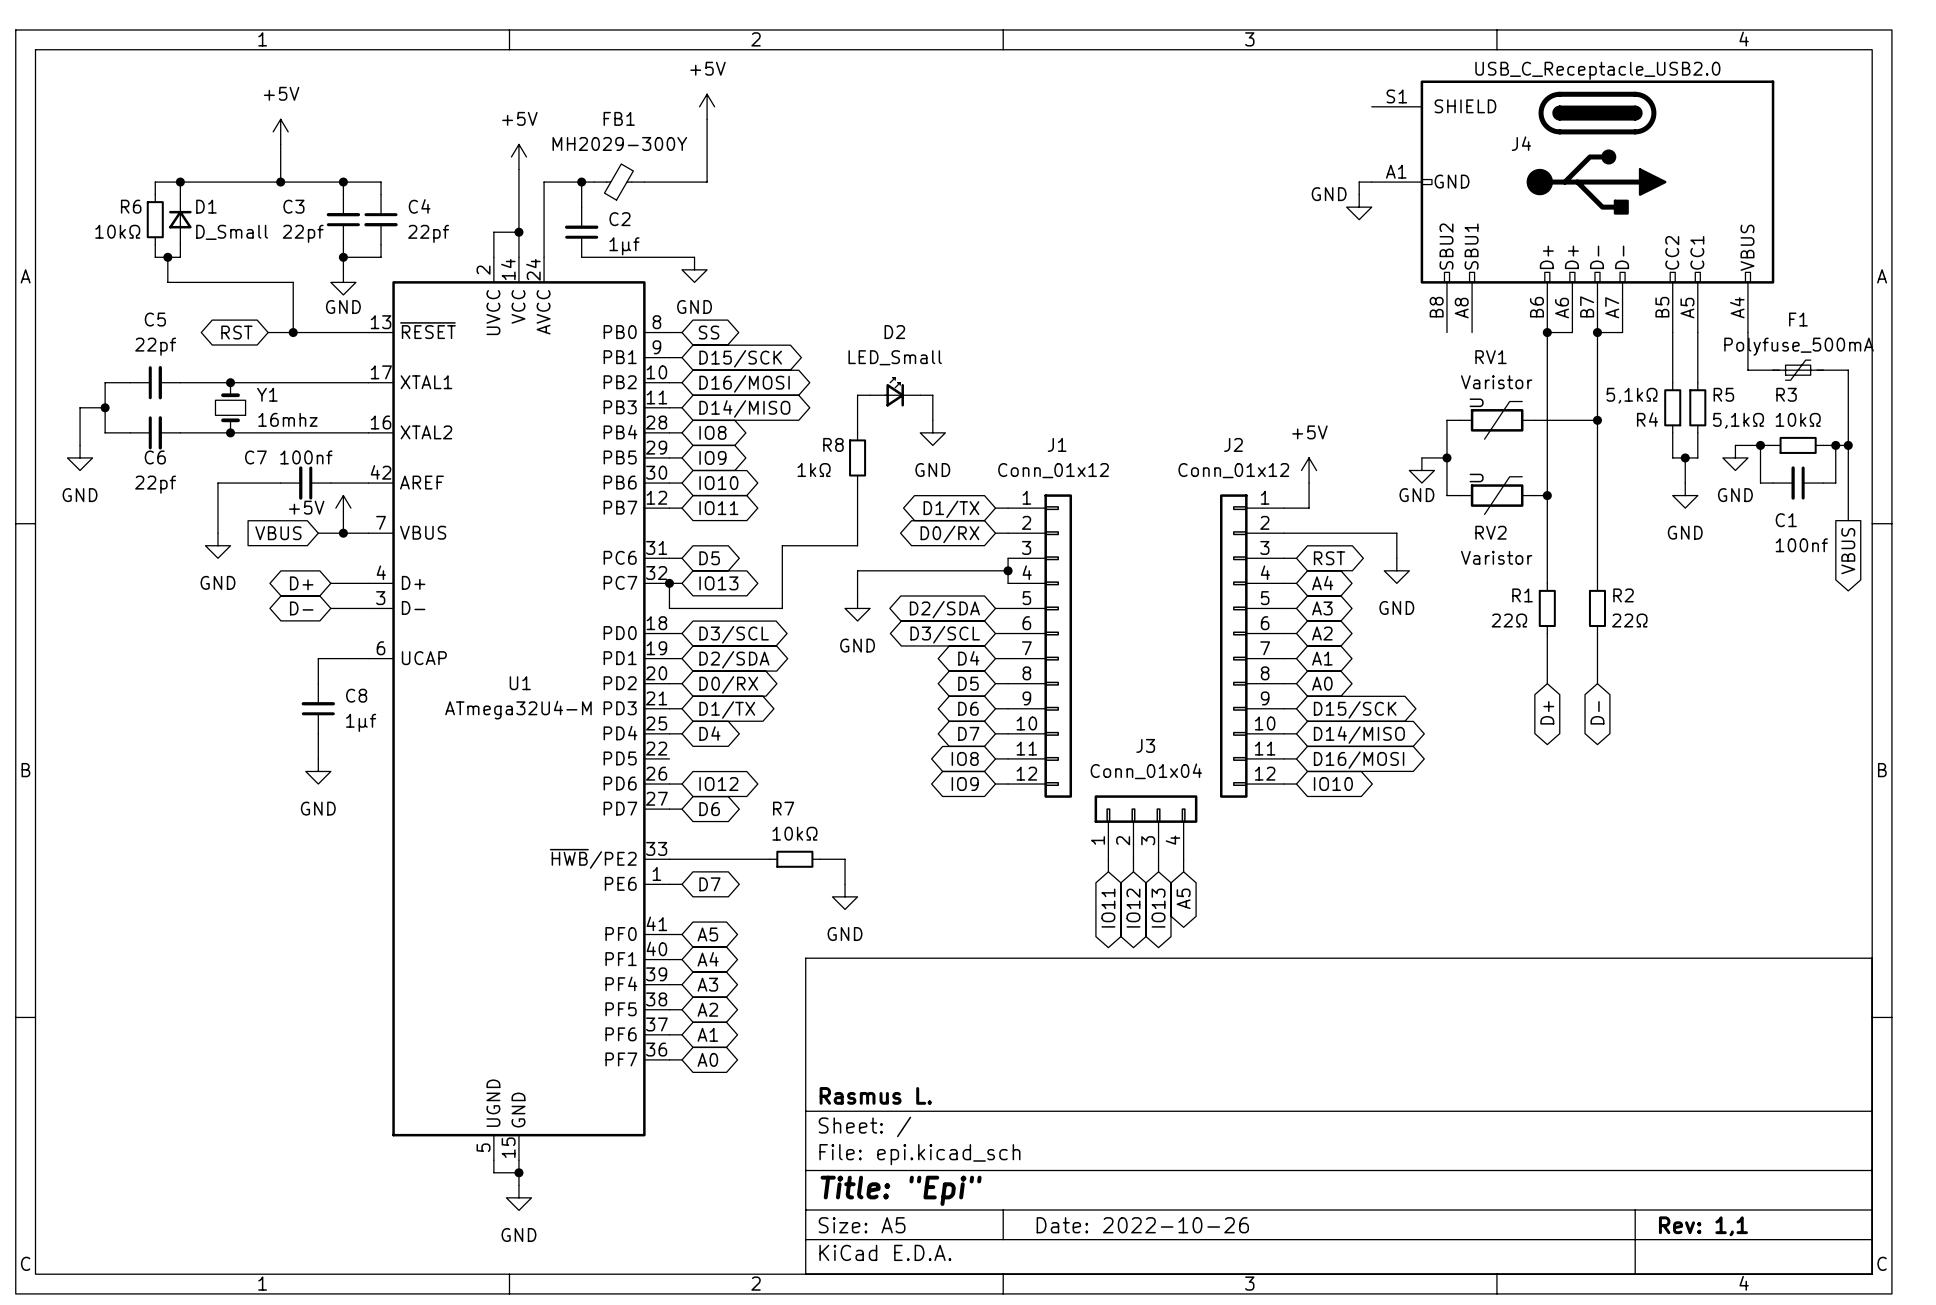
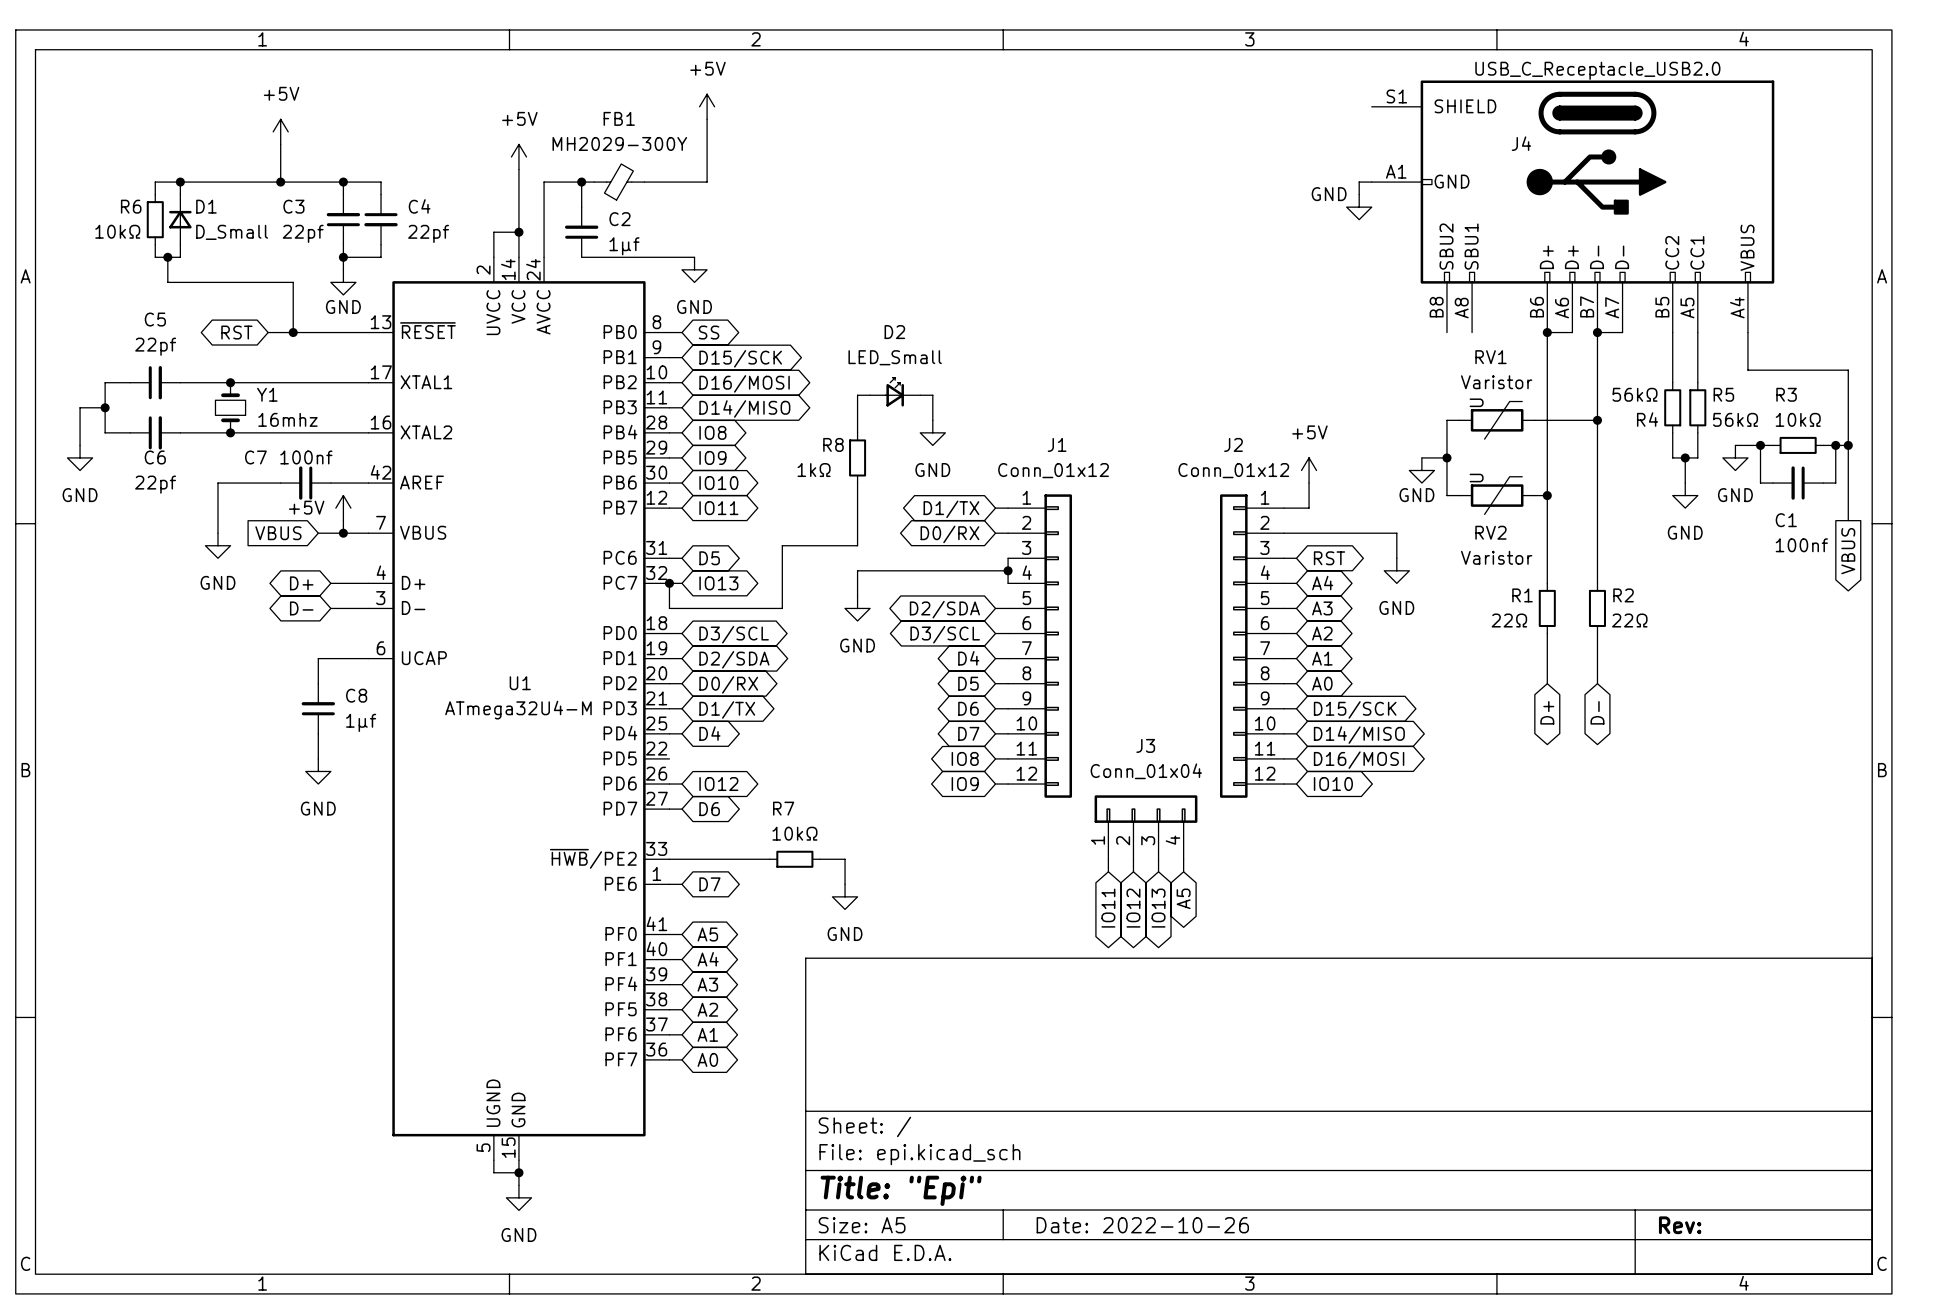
F1: Polyfuse_500mA (1798, 370) -> none
R4 value: 5,1kΩ (1632, 395) -> 56kΩ (1635, 394)
R5 value: 5,1kΩ (1738, 420) -> 56kΩ (1735, 419)
title block: Rasmus L. (875, 1095) -> none
title block: Rev: 1,1 (1703, 1226) -> Rev: (1680, 1225)

